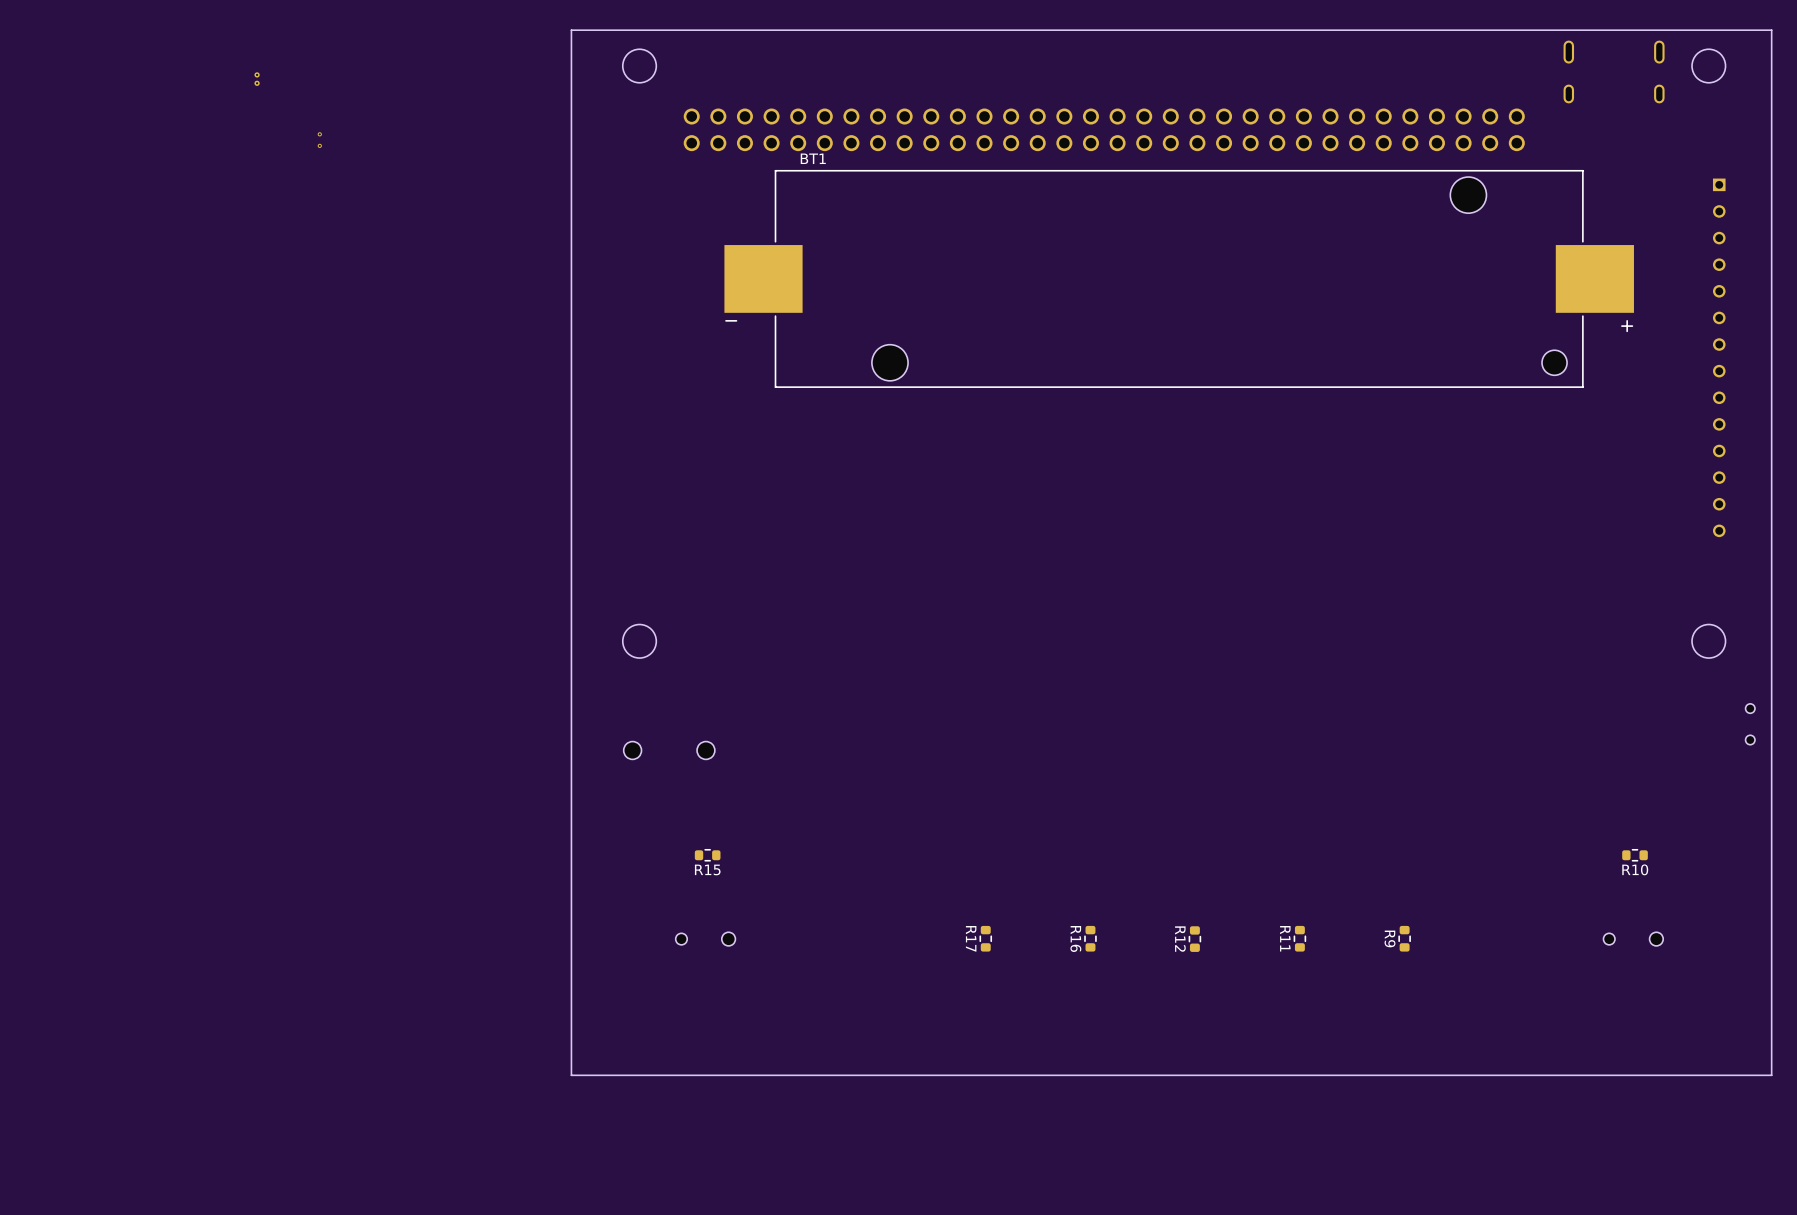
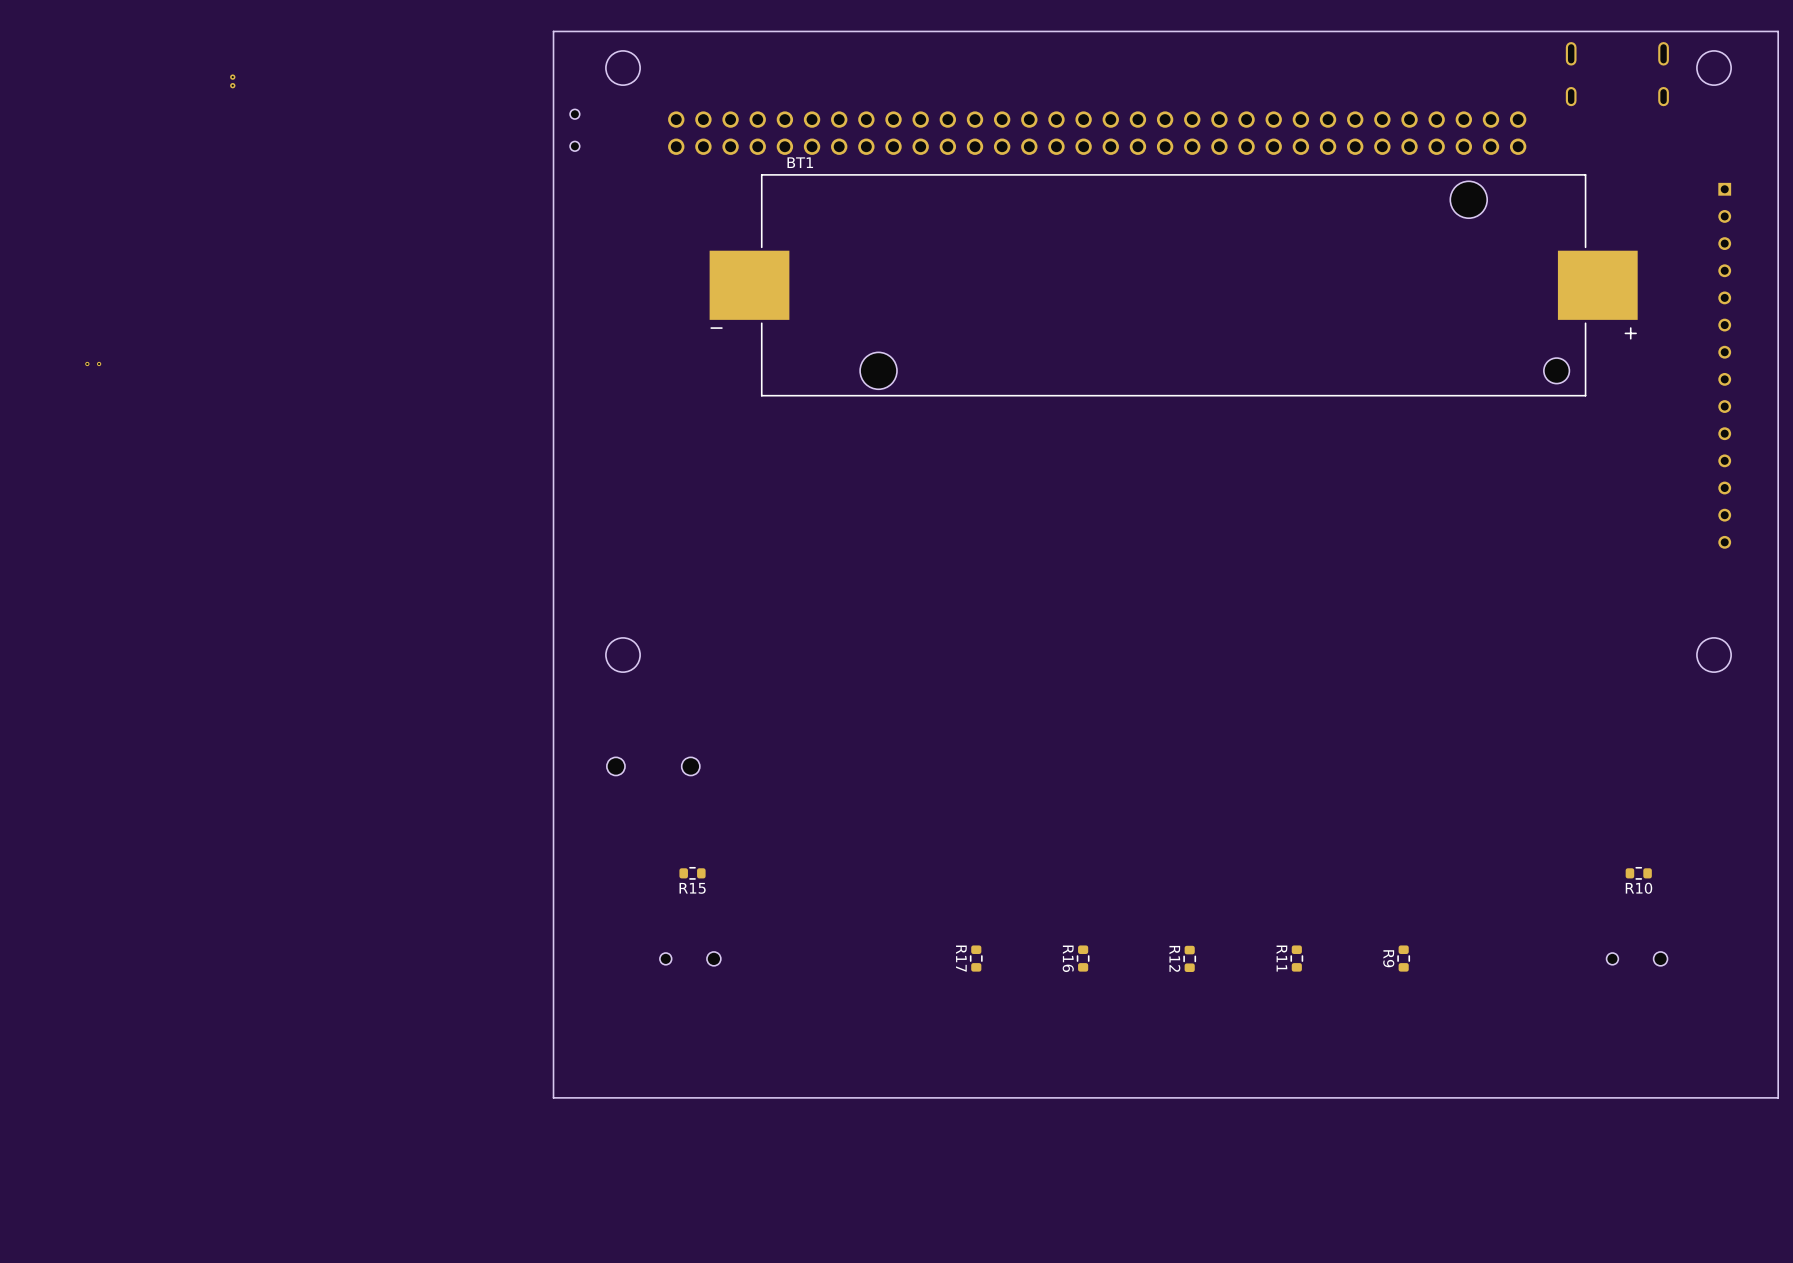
part: none -> (574, 130)
part: (319, 140) -> none
part: none -> (93, 363)
part: (1750, 724) -> none

